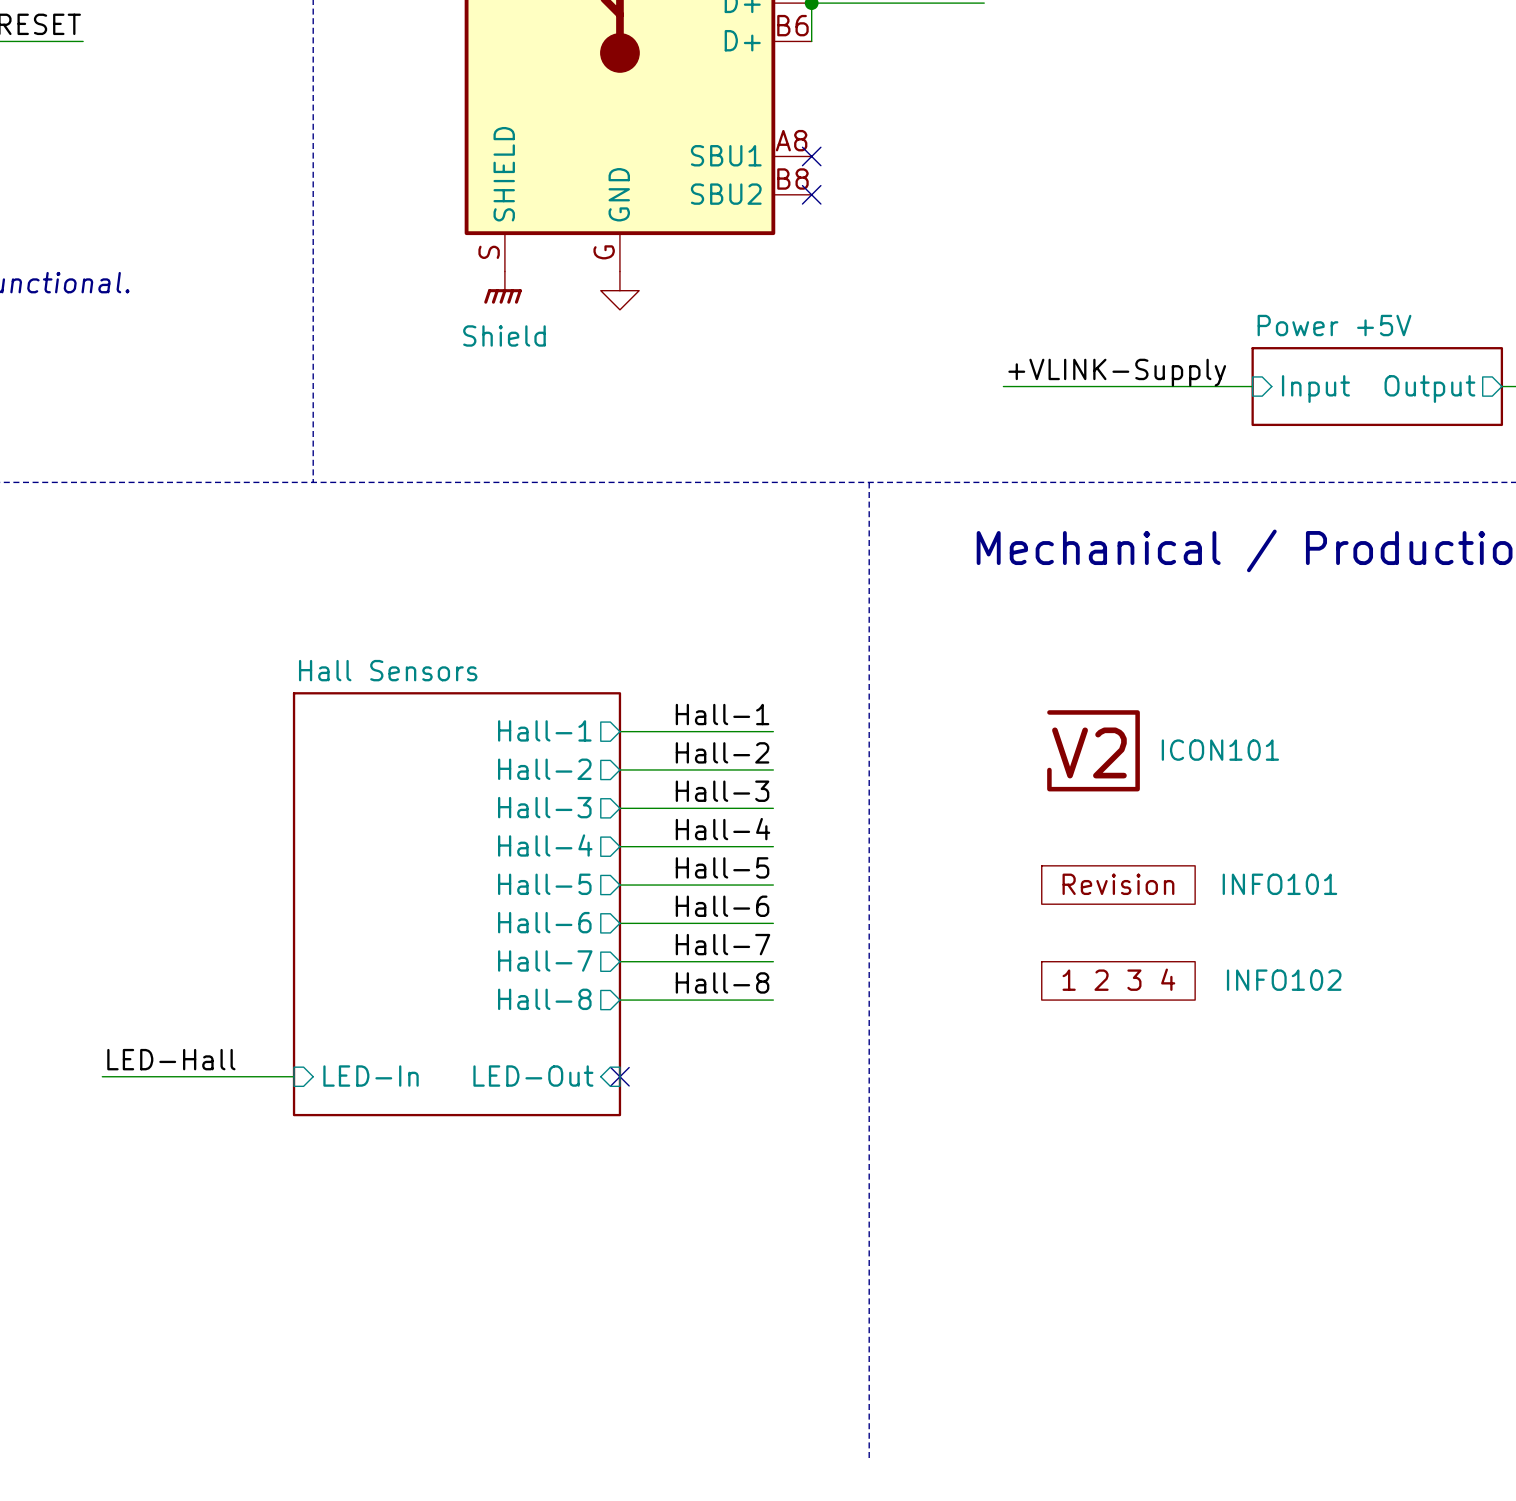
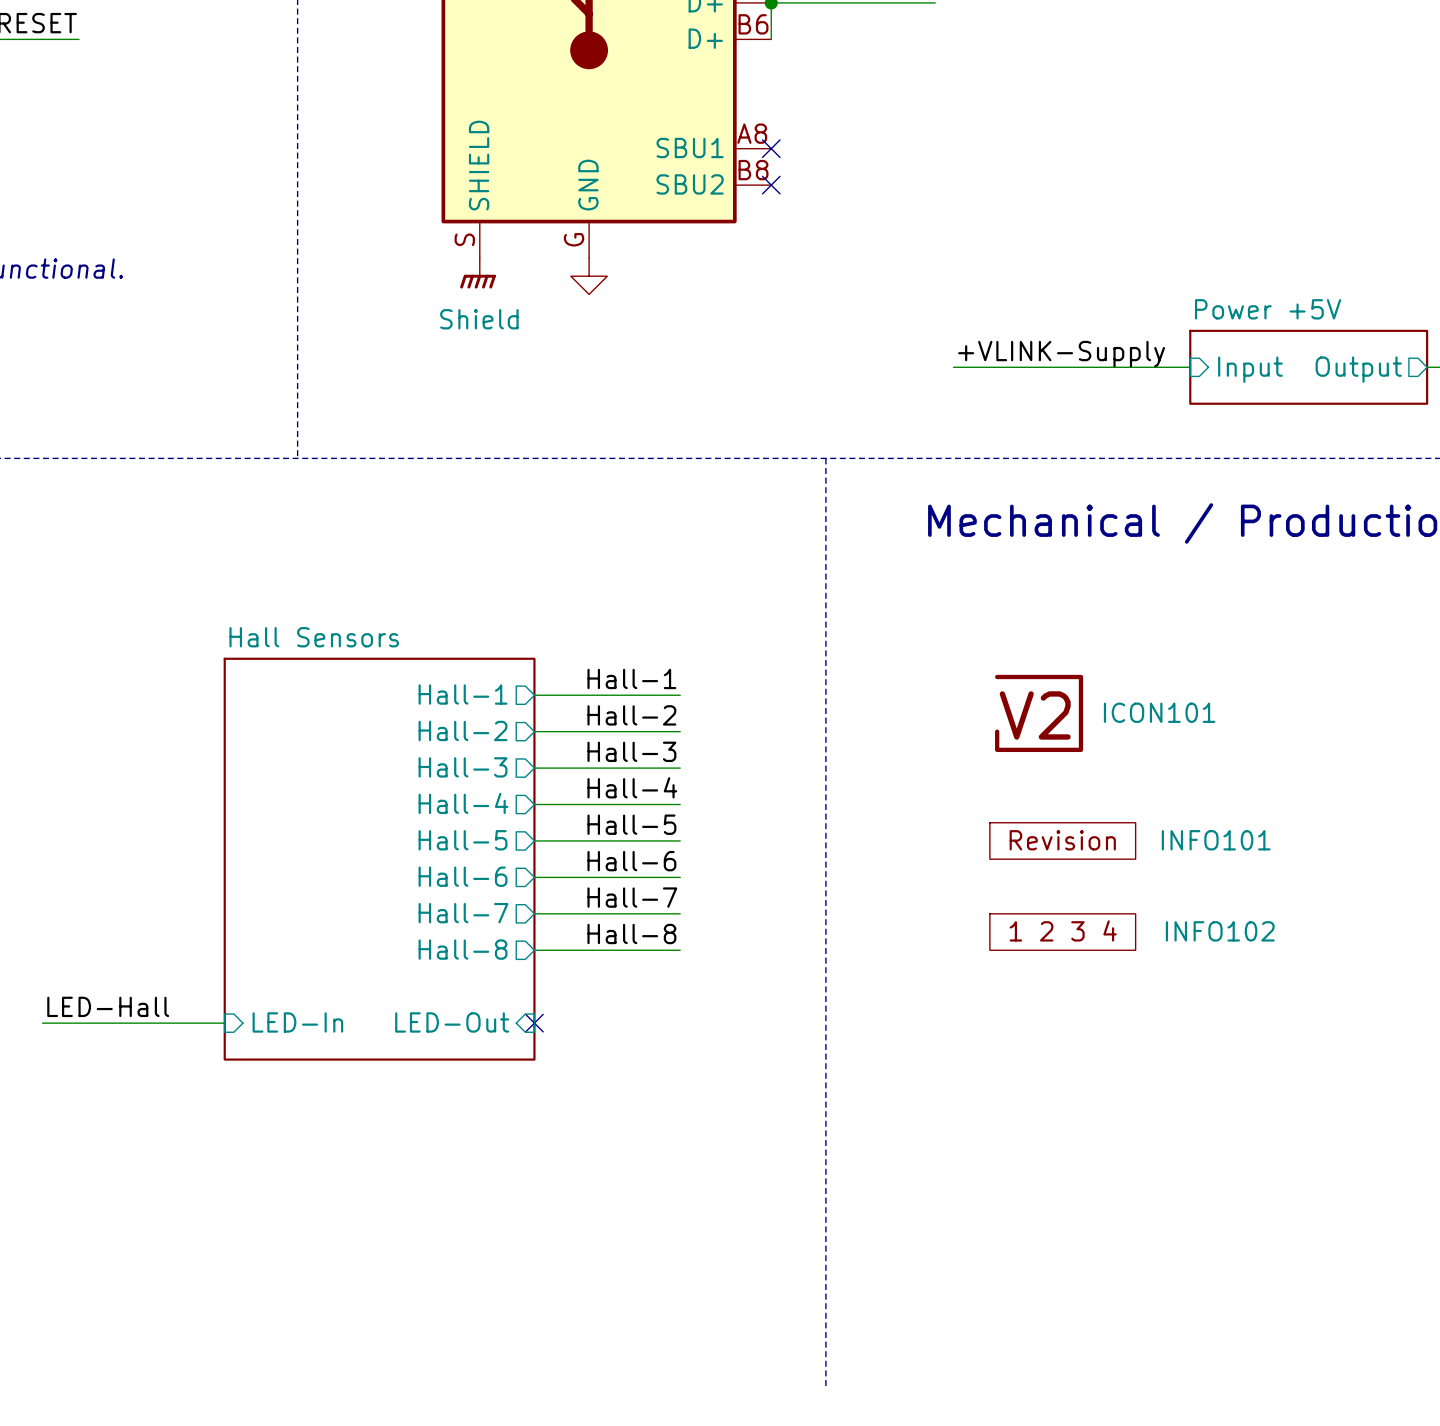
label position: Hall-1 (722, 714) -> Hall-1 (631, 678)
sheet pin position: Hall-1 (544, 730) -> Hall-1 (463, 694)
wire: (715, 731) (773, 731) -> (534, 695) (589, 695)
label position: Hall-2 (722, 752) -> Hall-2 (631, 715)
sheet pin position: Hall-2 (544, 769) -> Hall-2 (463, 730)
wire: (715, 769) (773, 769) -> (534, 731) (589, 731)
label position: Hall-3 (722, 791) -> Hall-3 (631, 751)
sheet pin position: Hall-3 (544, 807) -> Hall-3 (463, 767)
wire: (715, 808) (773, 808) -> (534, 768) (589, 768)
label position: Hall-4 (722, 829) -> Hall-4 (632, 787)
sheet pin position: Hall-4 (545, 845) -> Hall-4 (463, 803)
wire: (715, 846) (773, 846) -> (534, 804) (589, 804)
label position: Hall-5 (722, 867) -> Hall-5 (631, 824)
sheet pin position: Hall-5 (544, 884) -> Hall-5 (463, 840)
wire: (715, 885) (773, 885) -> (534, 840) (589, 840)
sheet Hall Sensors position: (456, 904) -> (379, 859)
label position: Hall-6 (722, 906) -> Hall-6 (631, 861)
sheet pin position: Hall-6 (544, 922) -> Hall-6 (463, 876)
wire: (715, 923) (773, 923) -> (534, 877) (589, 877)
label position: Hall-7 (722, 944) -> Hall-7 (632, 897)
sheet pin position: Hall-7 (545, 960) -> Hall-7 (463, 913)
wire: (715, 961) (773, 961) -> (534, 913) (589, 913)
label position: Hall-8 (722, 982) -> Hall-8 (631, 934)
sheet pin position: Hall-8 (544, 999) -> Hall-8 (463, 949)
wire: (715, 1000) (773, 1000) -> (534, 950) (589, 950)
label position: LED-Hall (171, 1059) -> LED-Hall (108, 1006)
wire: (236, 1076) (294, 1076) -> (42, 1023) (97, 1023)
sheet pin position: LED-In (371, 1076) -> LED-In (297, 1022)
sheet pin position: LED-Out (533, 1076) -> LED-Out (452, 1022)
no-connect mark position: (619, 1076) -> (534, 1023)

